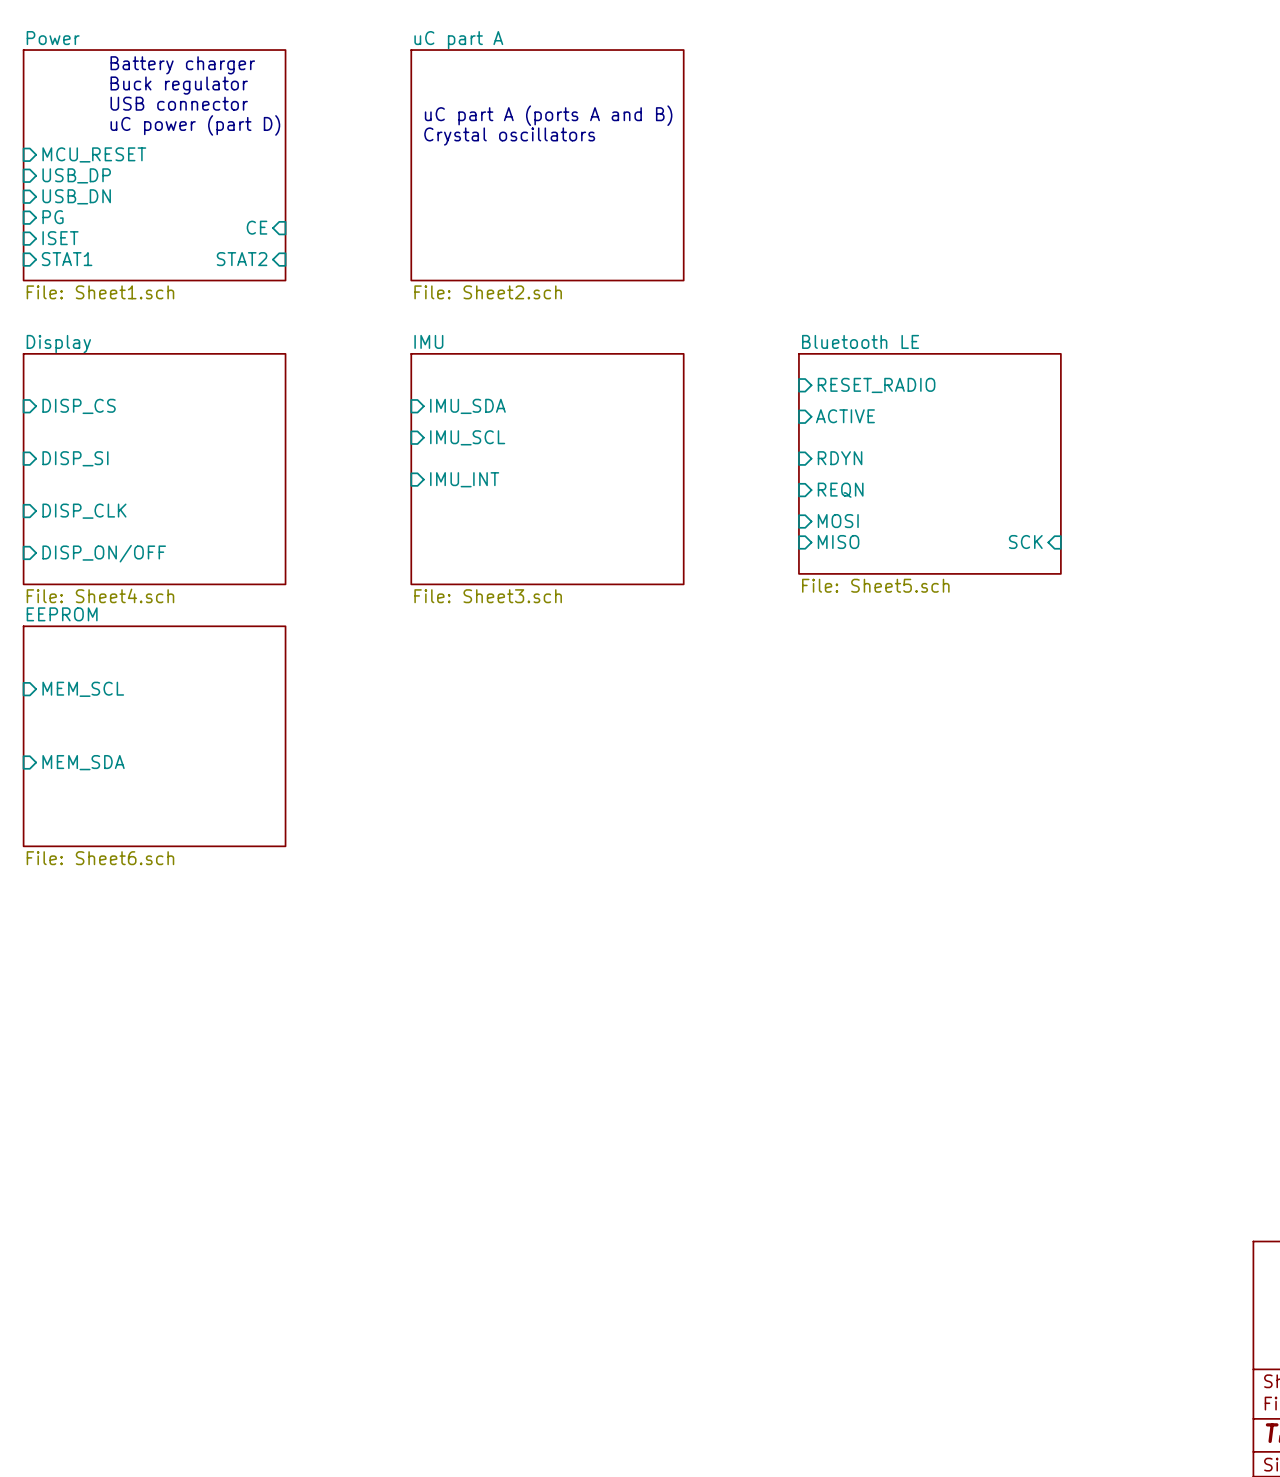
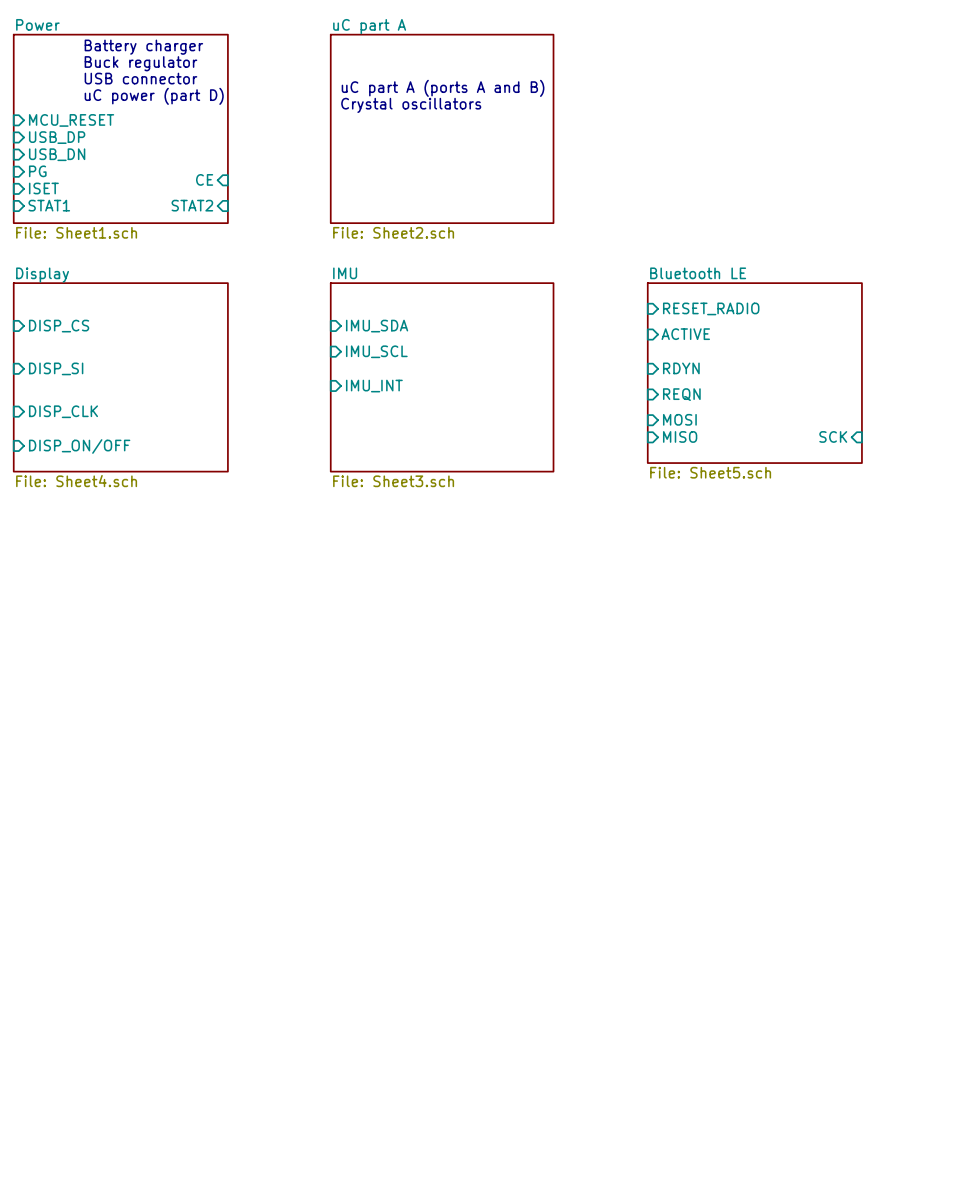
sheet pin: MEM_SCL (83, 689) -> none
sheet EEPROM: File: Sheet6.sch (154, 736) -> none
sheet pin: MEM_SDA (83, 762) -> none

